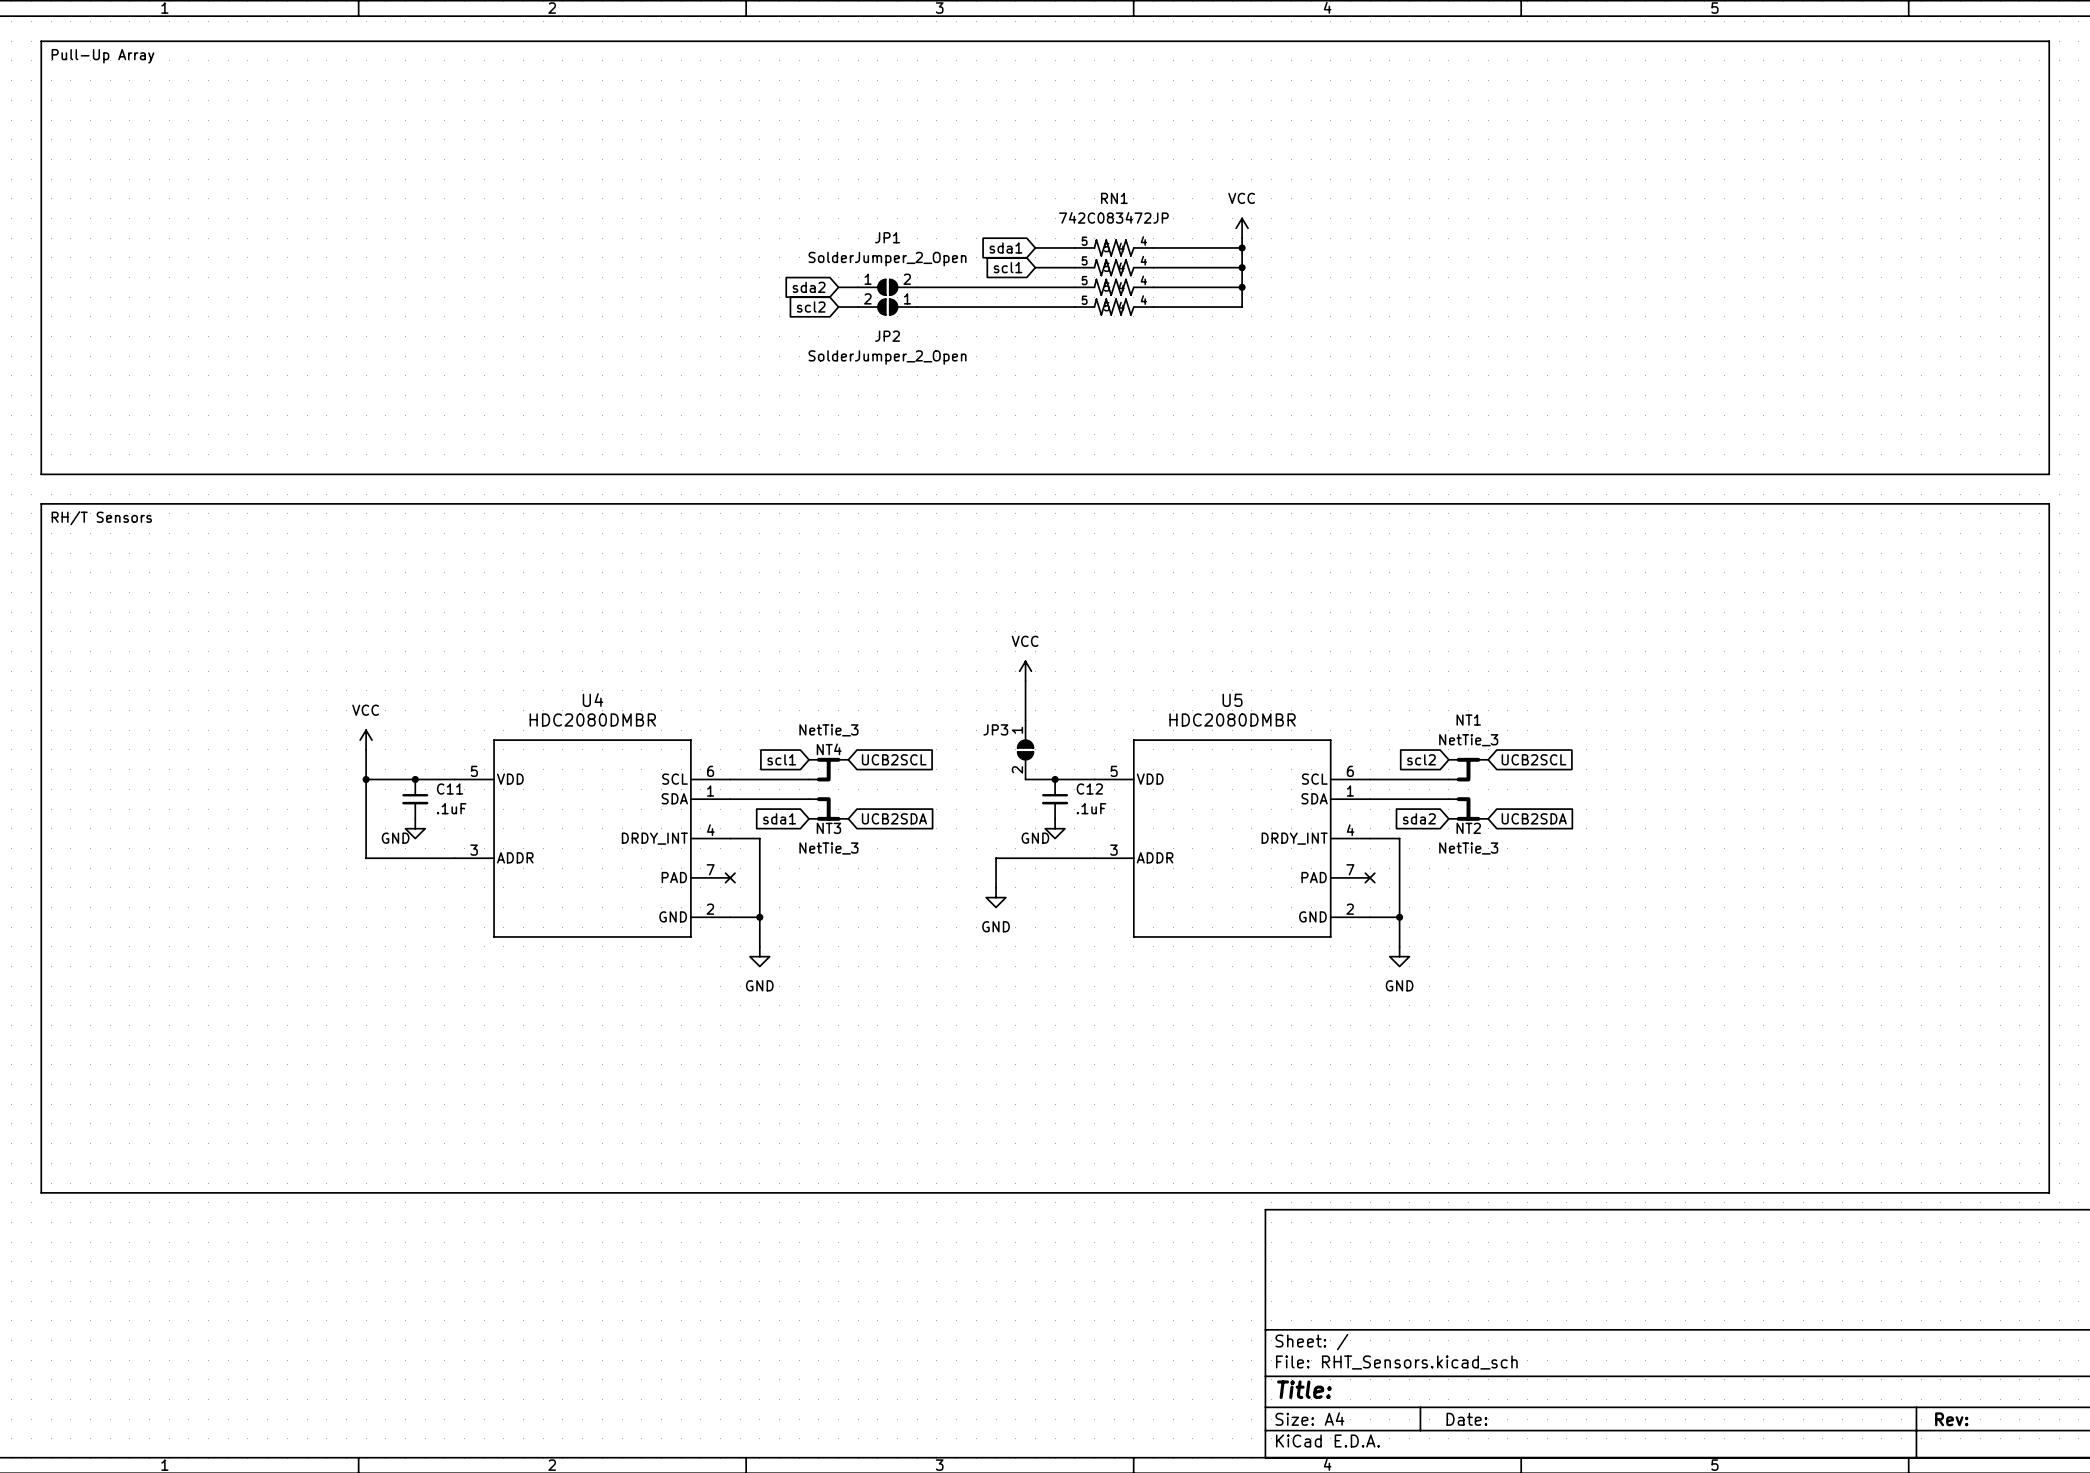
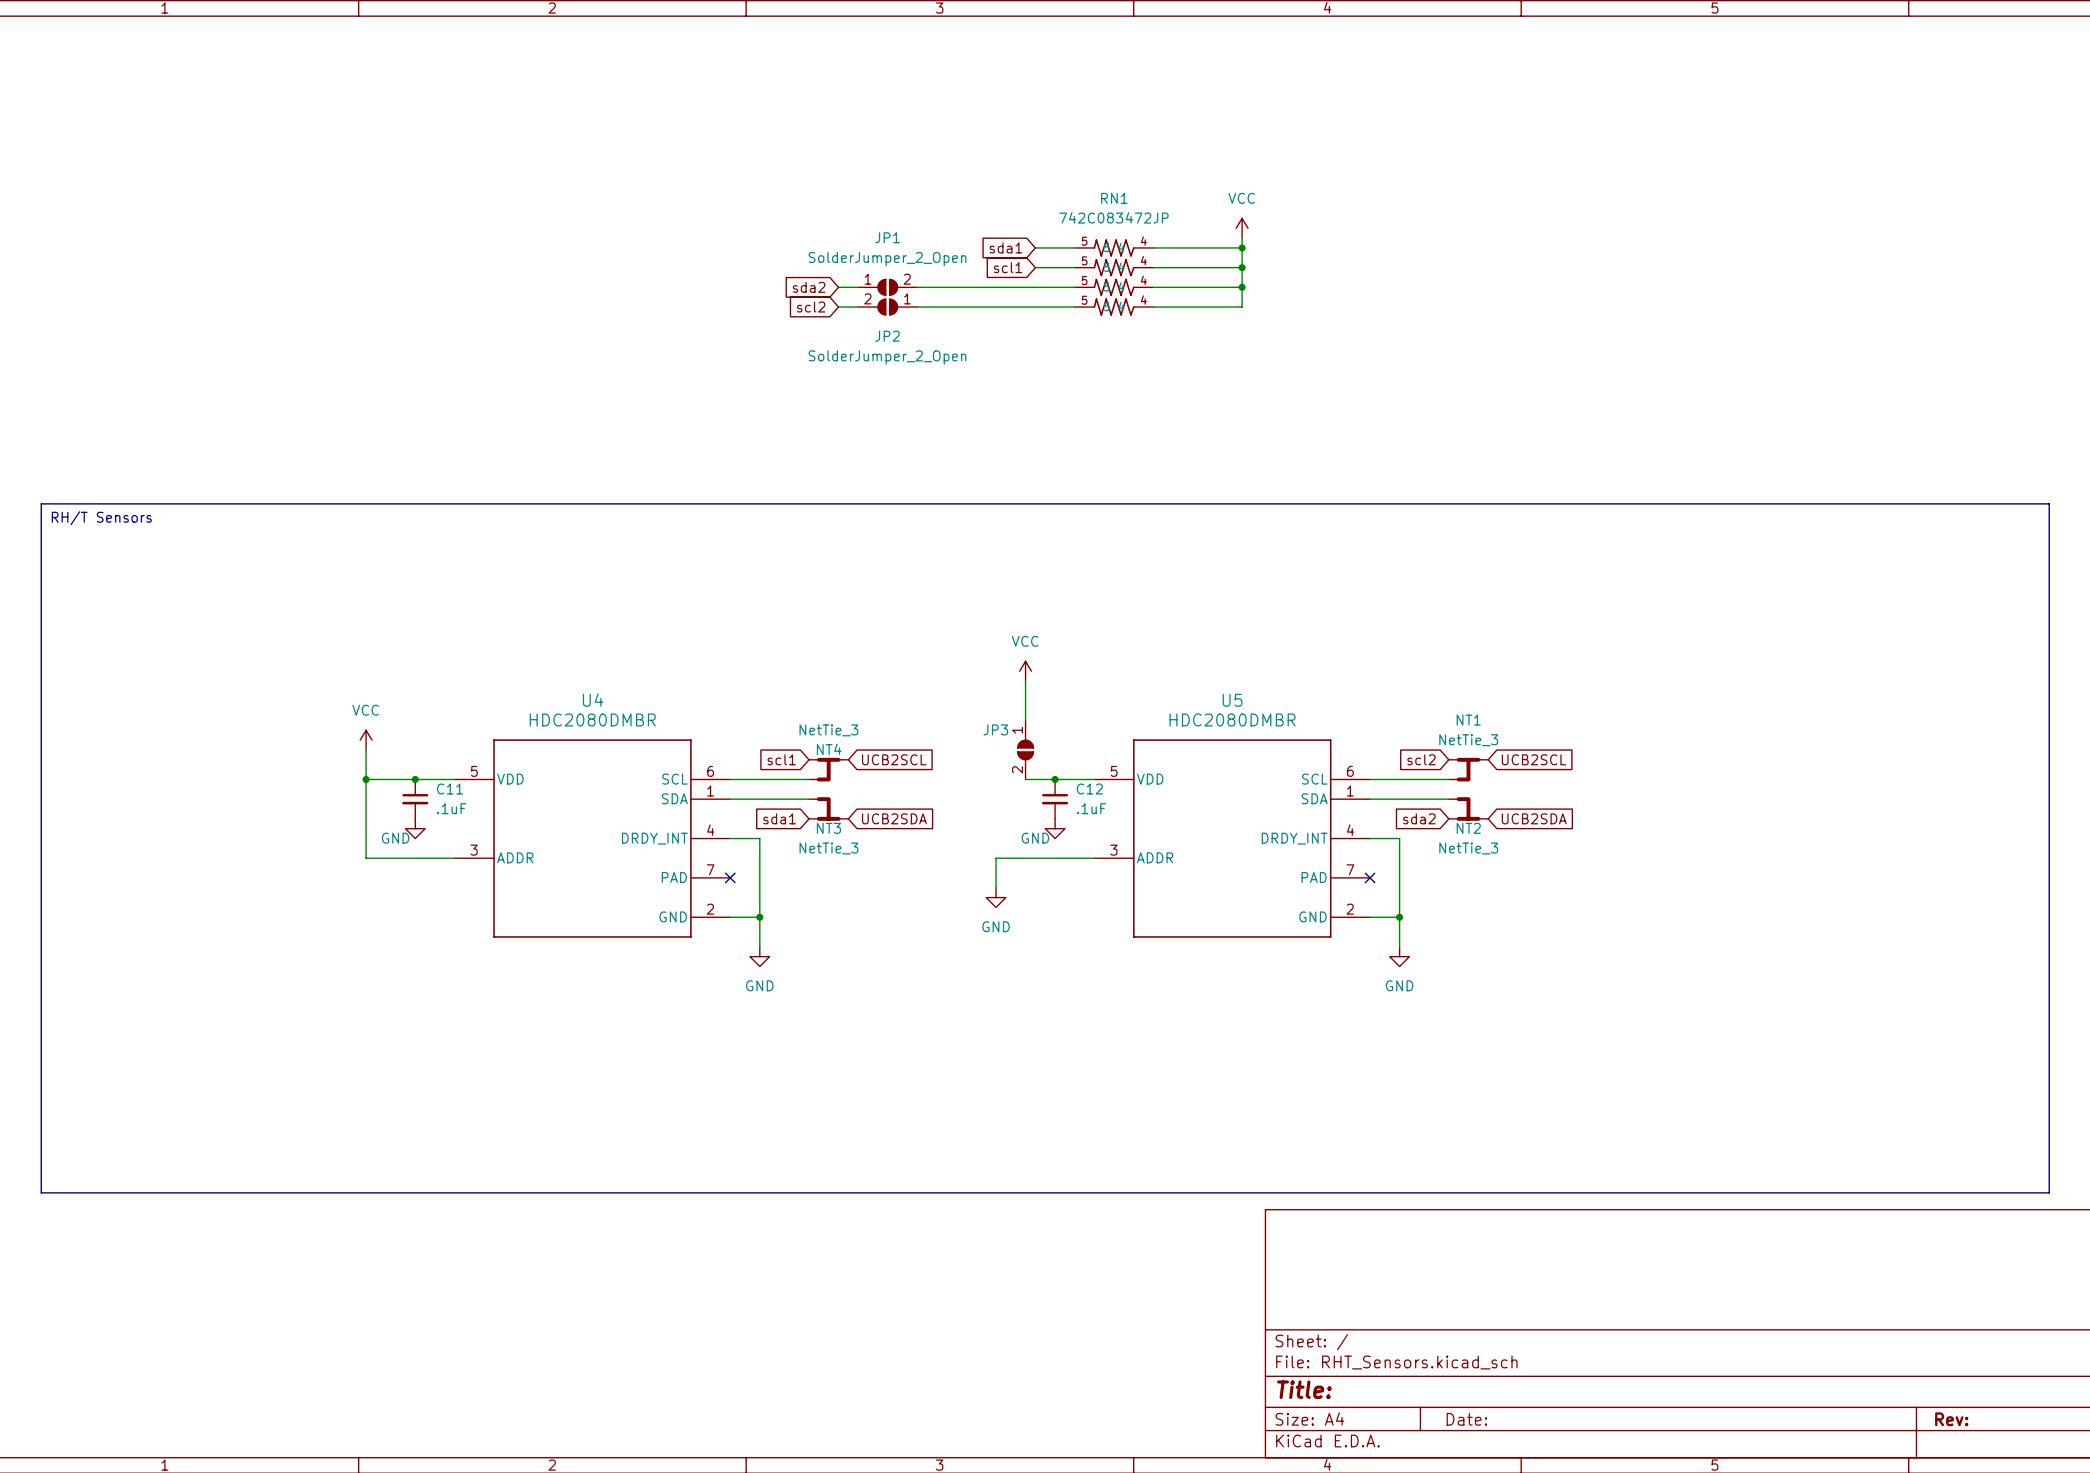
line: (41, 41) (2049, 41) (2049, 474) (41, 474) (41, 41) -> none
text: Pull-Up Array (102, 56) -> none

